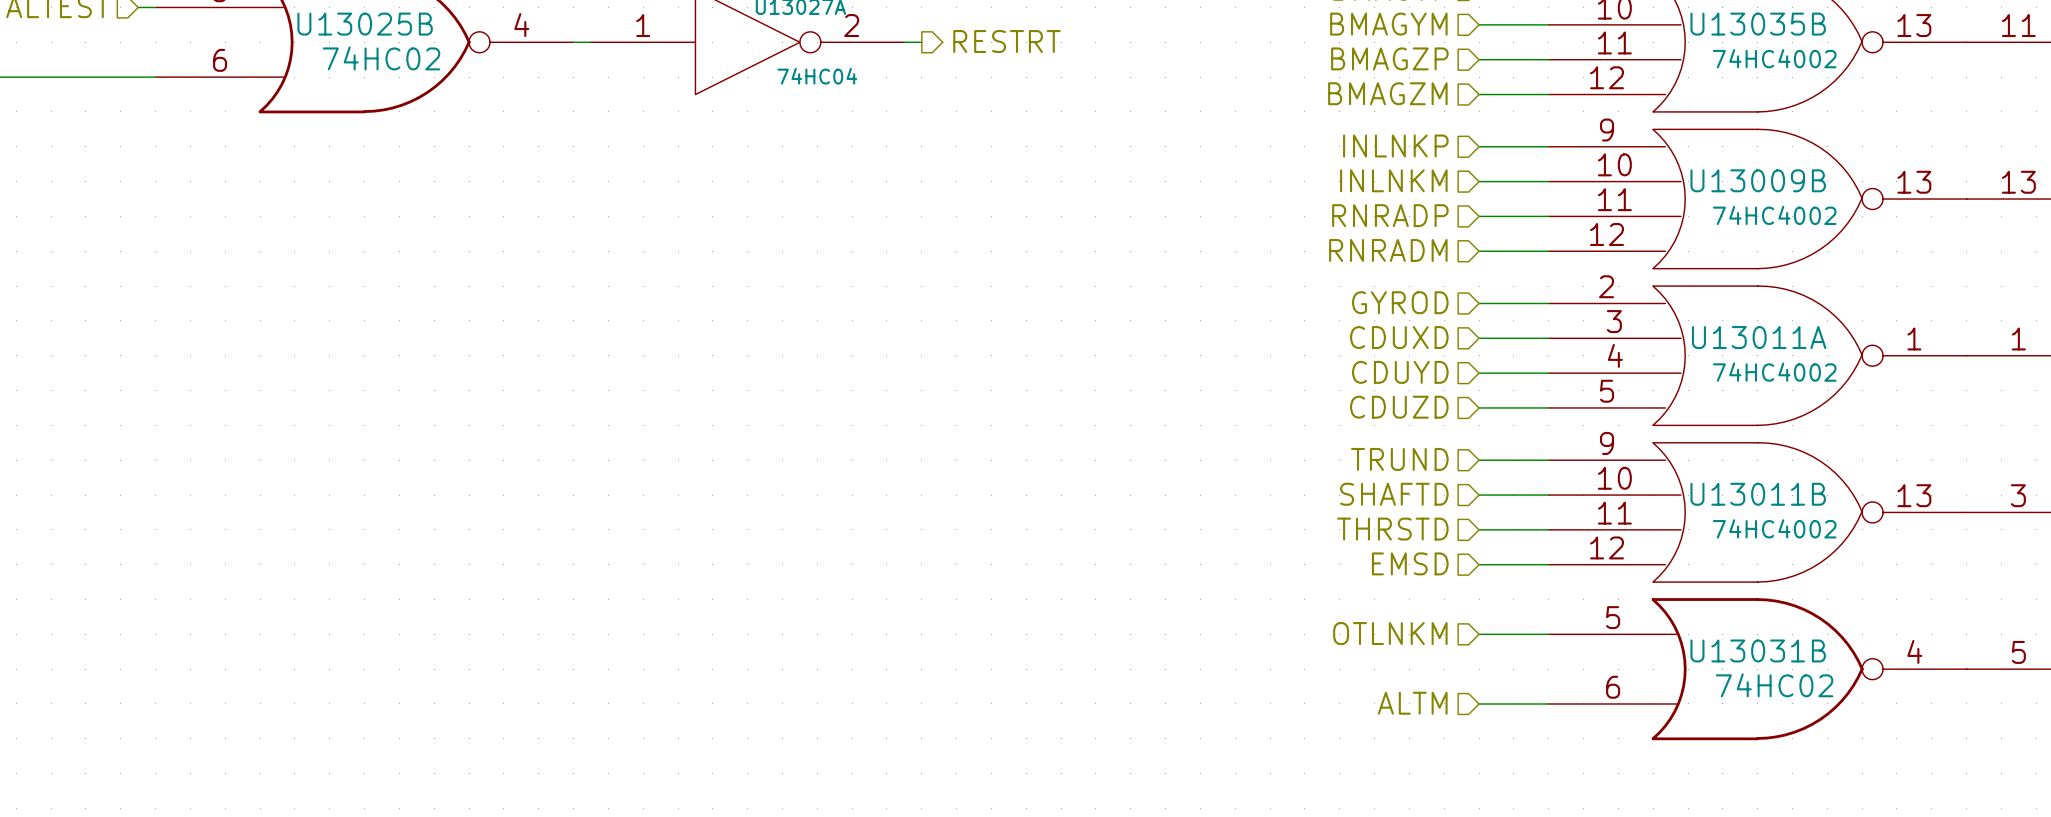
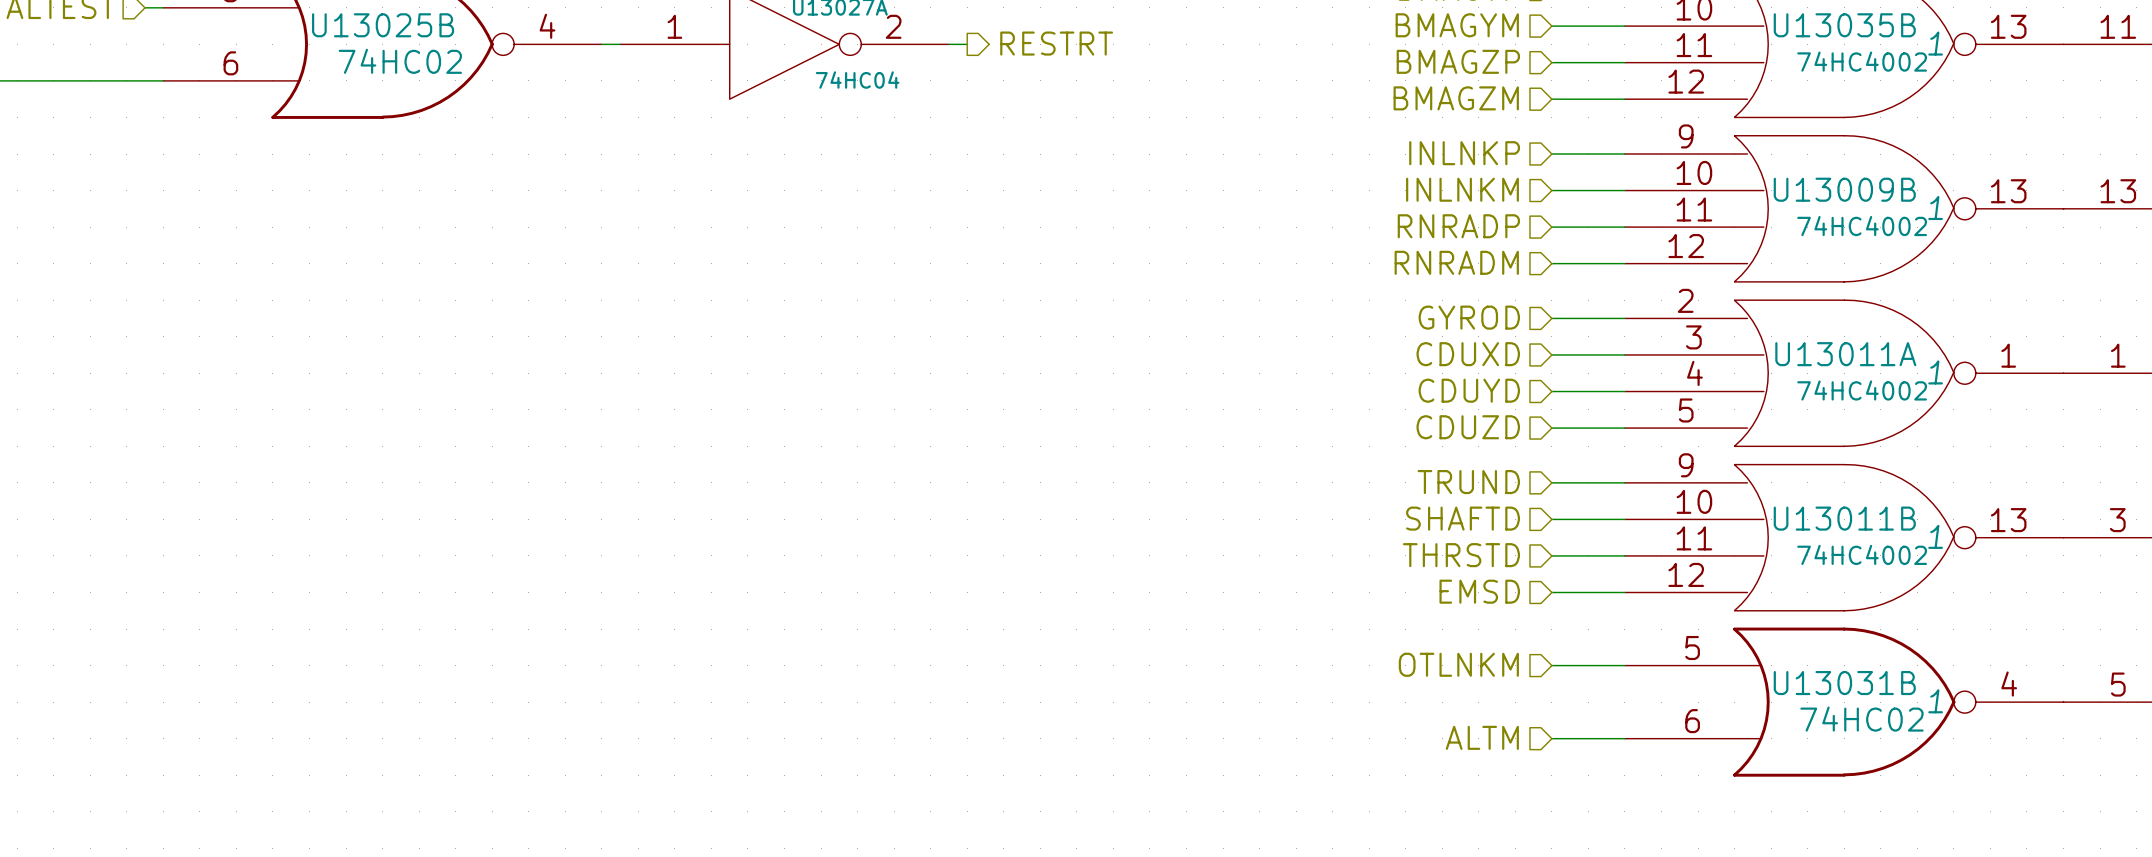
U13035B text: none -> 1 (1935, 43)
U13009B text: none -> 1 (1935, 207)
U13011A text: none -> 1 (1935, 372)
U13011B text: none -> 1 (1935, 536)
U13031B text: none -> 1 (1935, 701)

